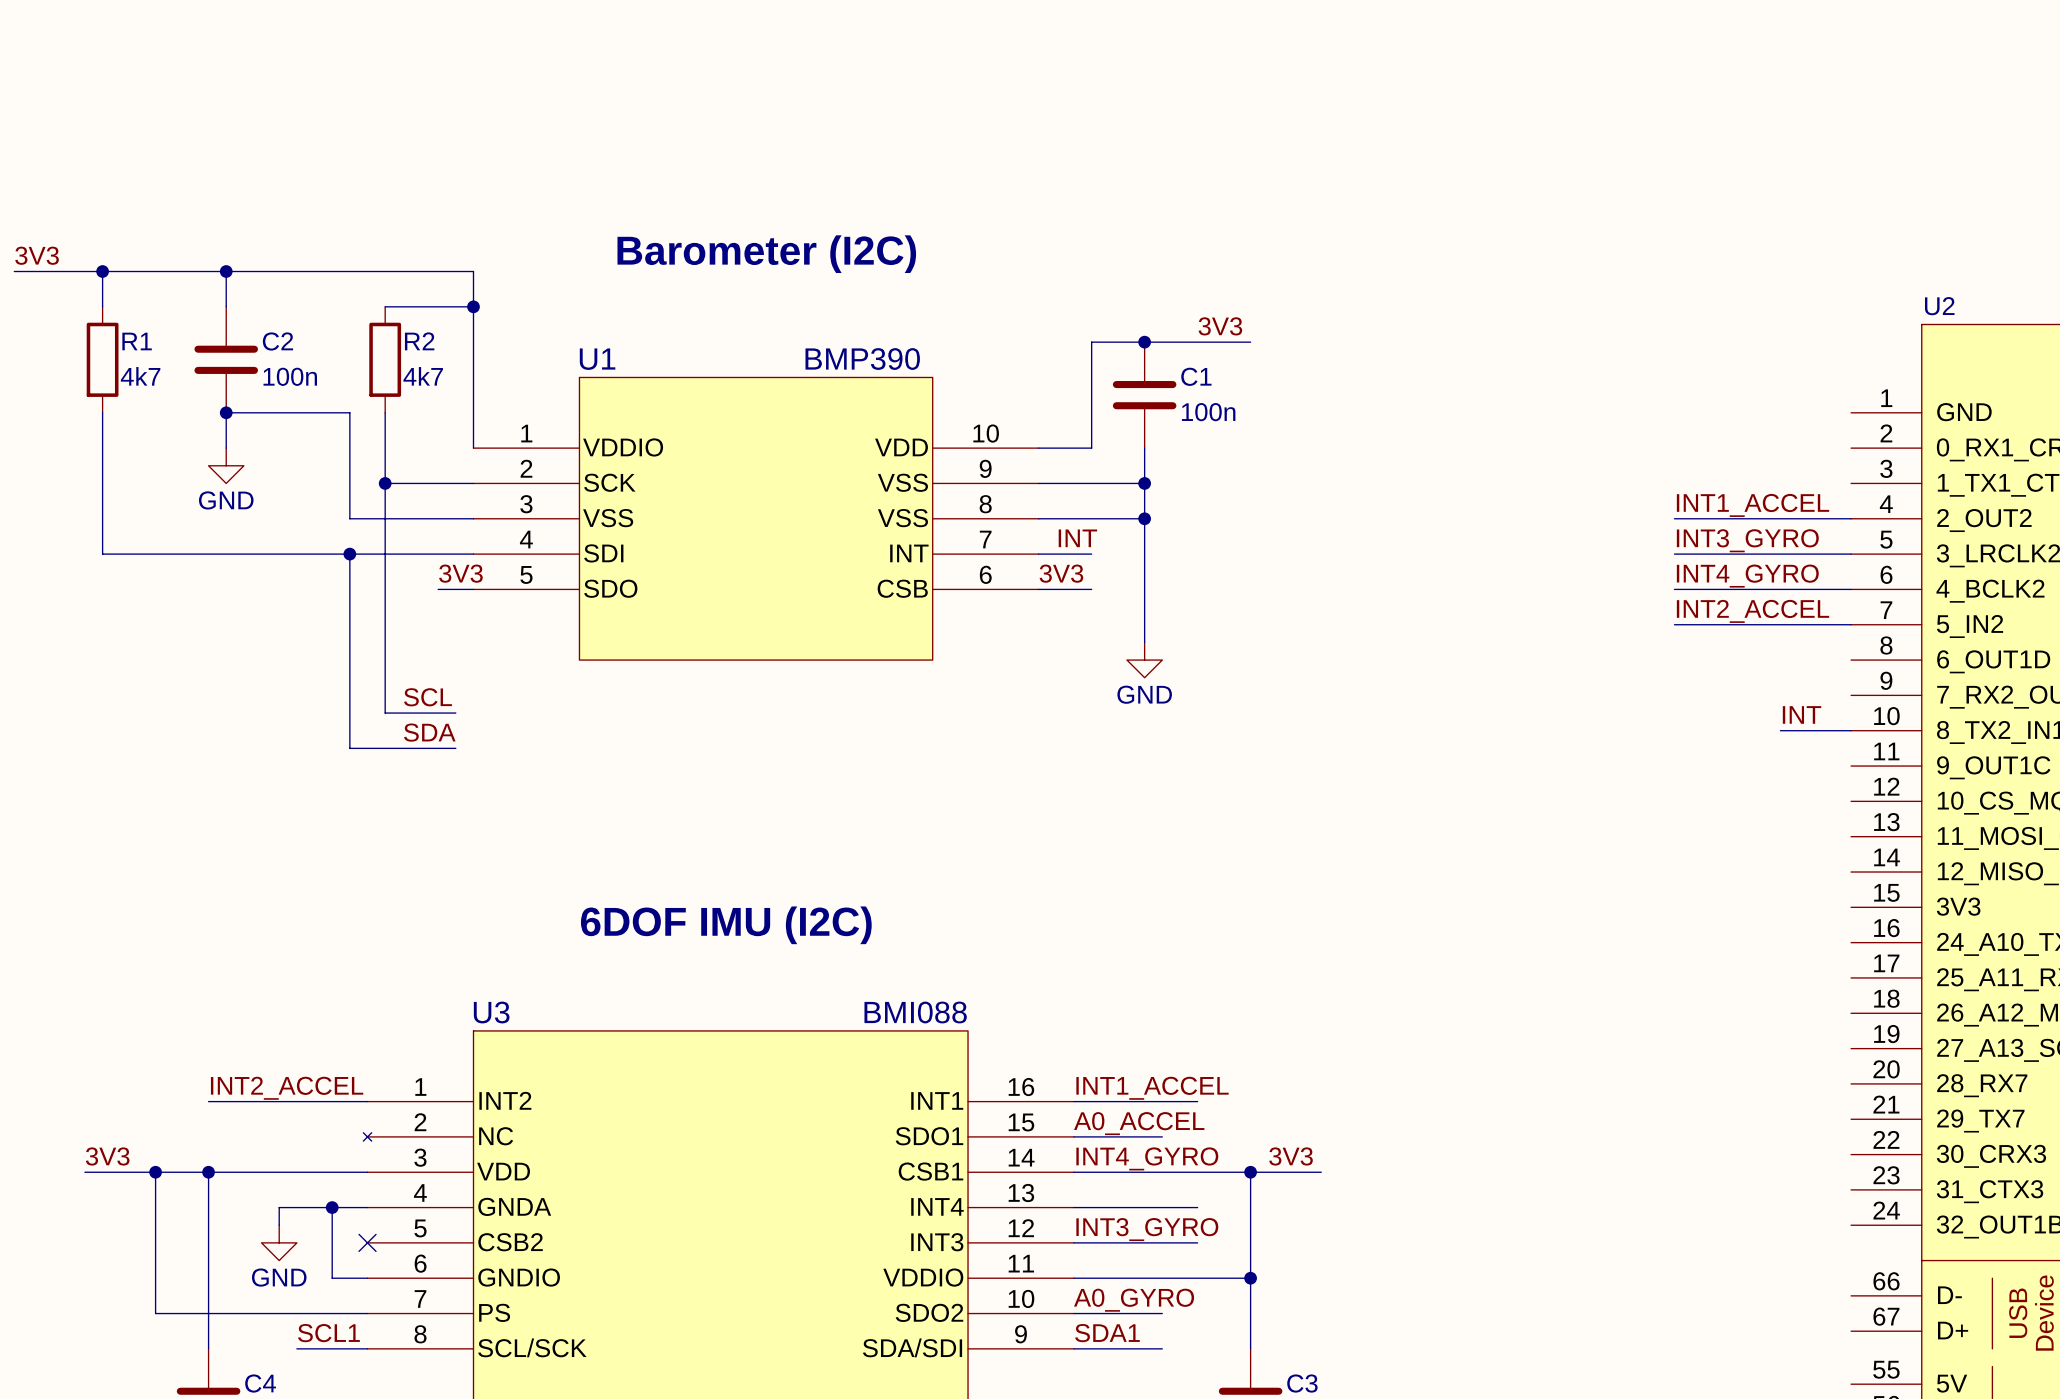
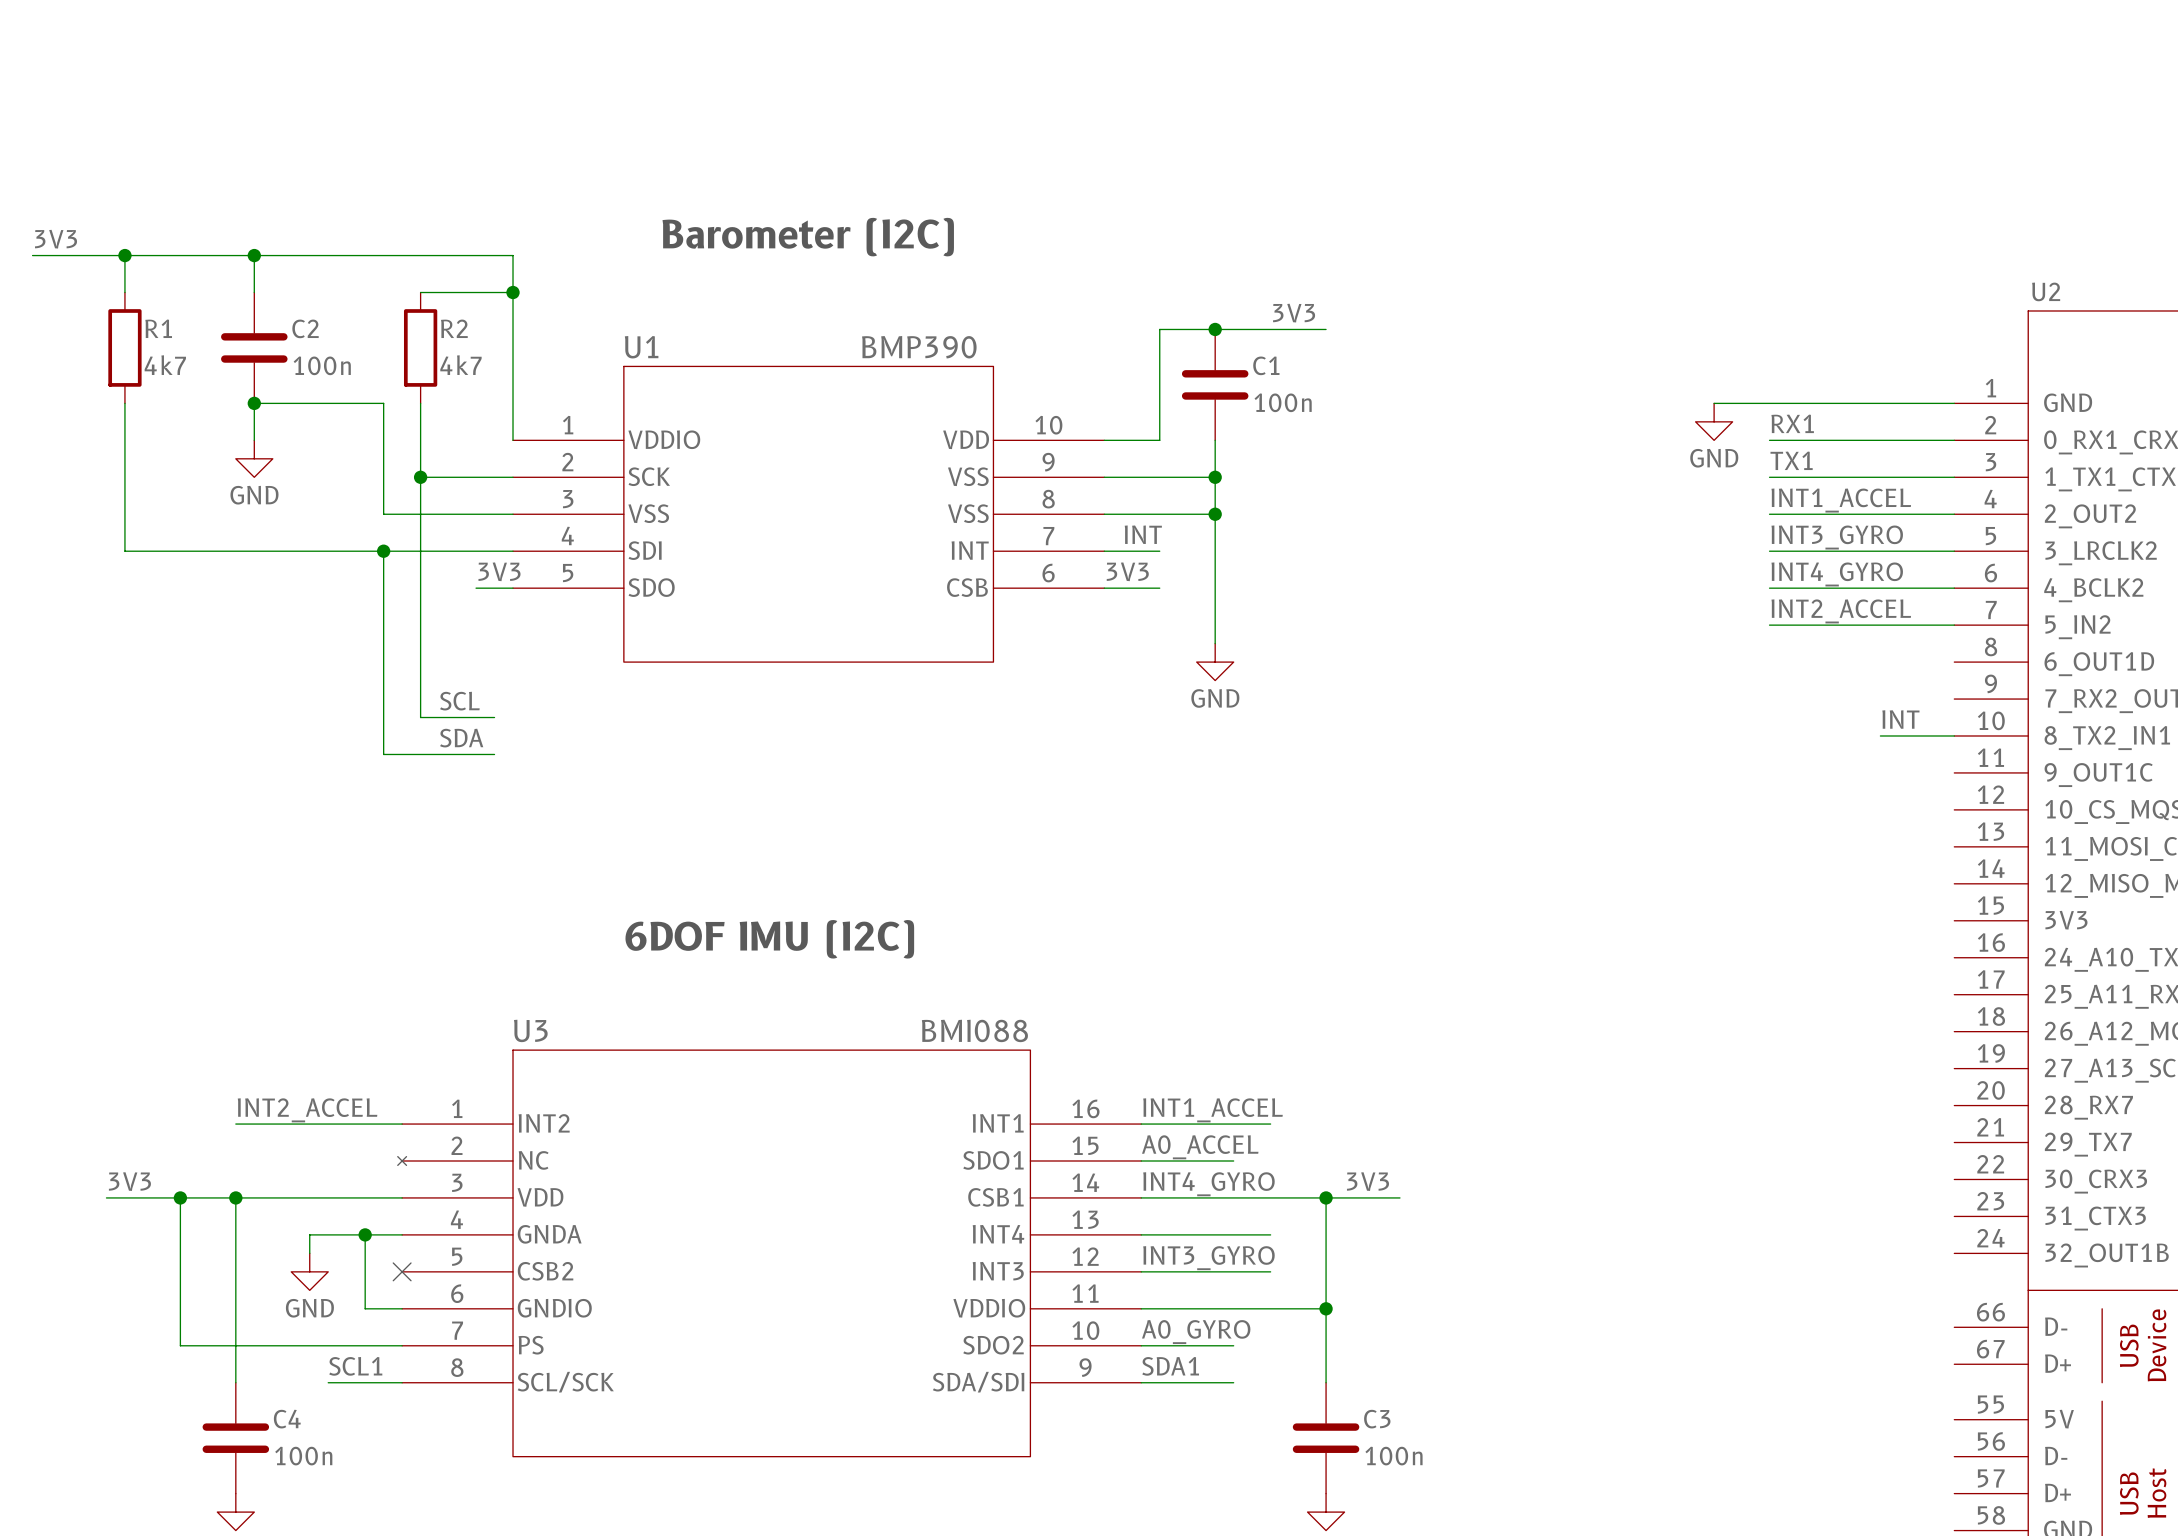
wire: none -> (1714, 403) (1954, 403)
power symbol: none -> GND (1714, 421)
label: none -> RX1 (1792, 423)
wire: none -> (1769, 440) (1954, 440)
label: none -> TX1 (1791, 460)
wire: none -> (1769, 477) (1954, 477)

